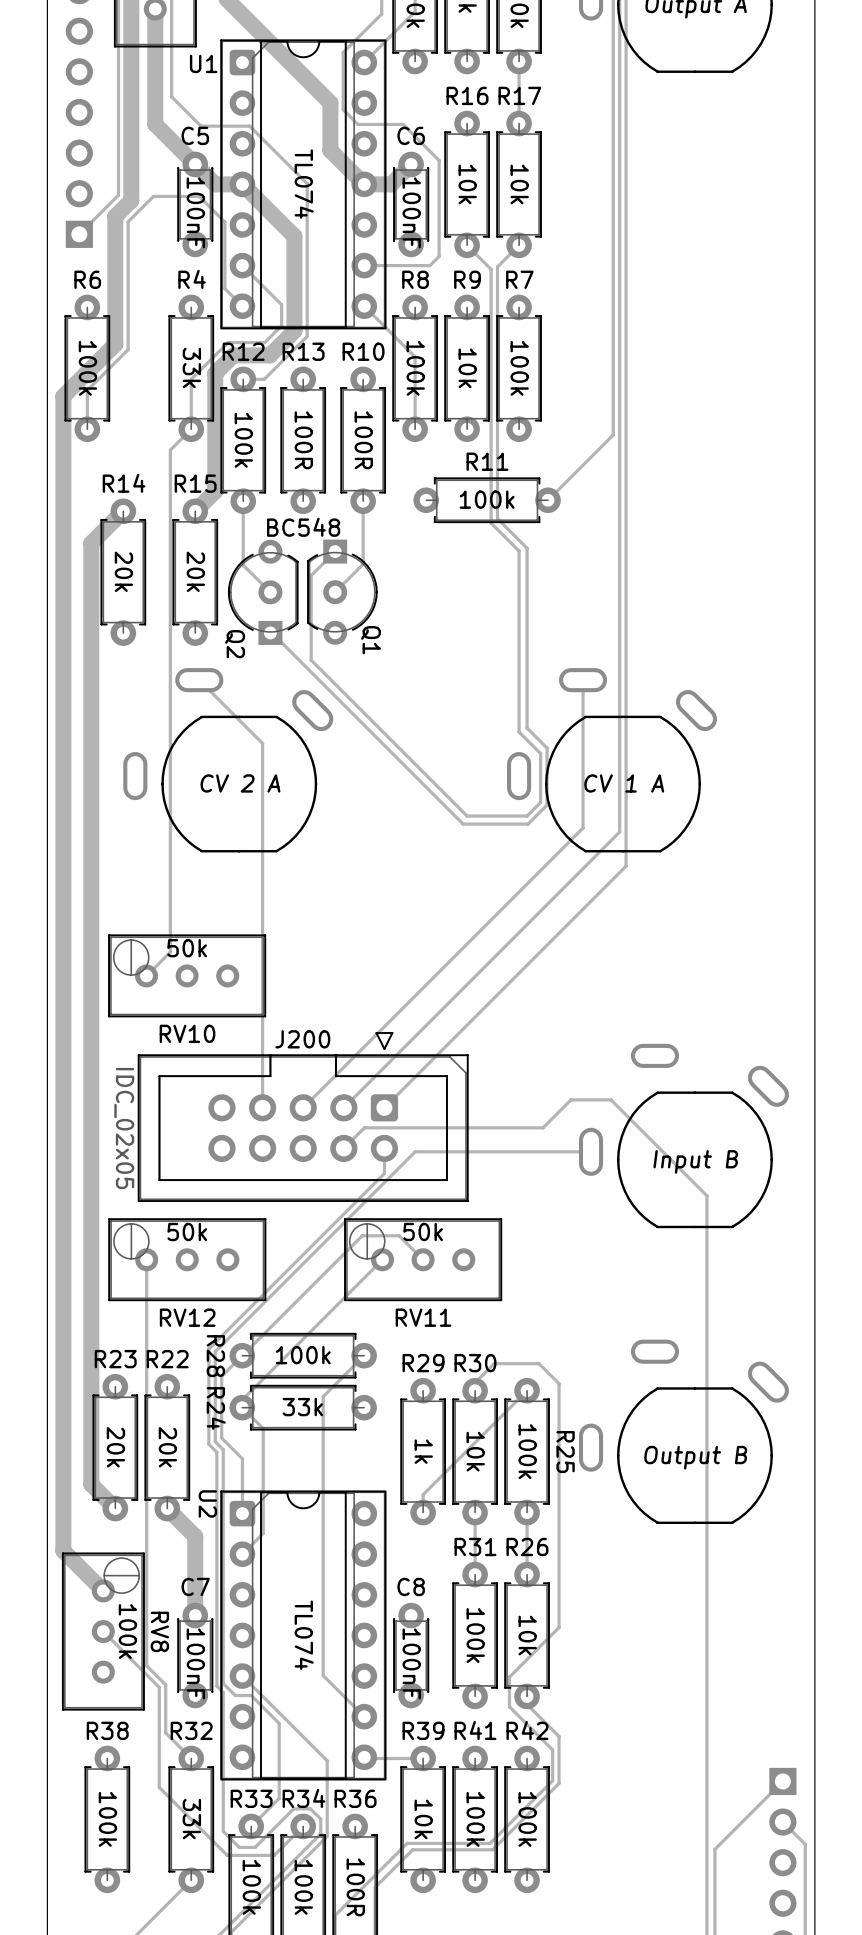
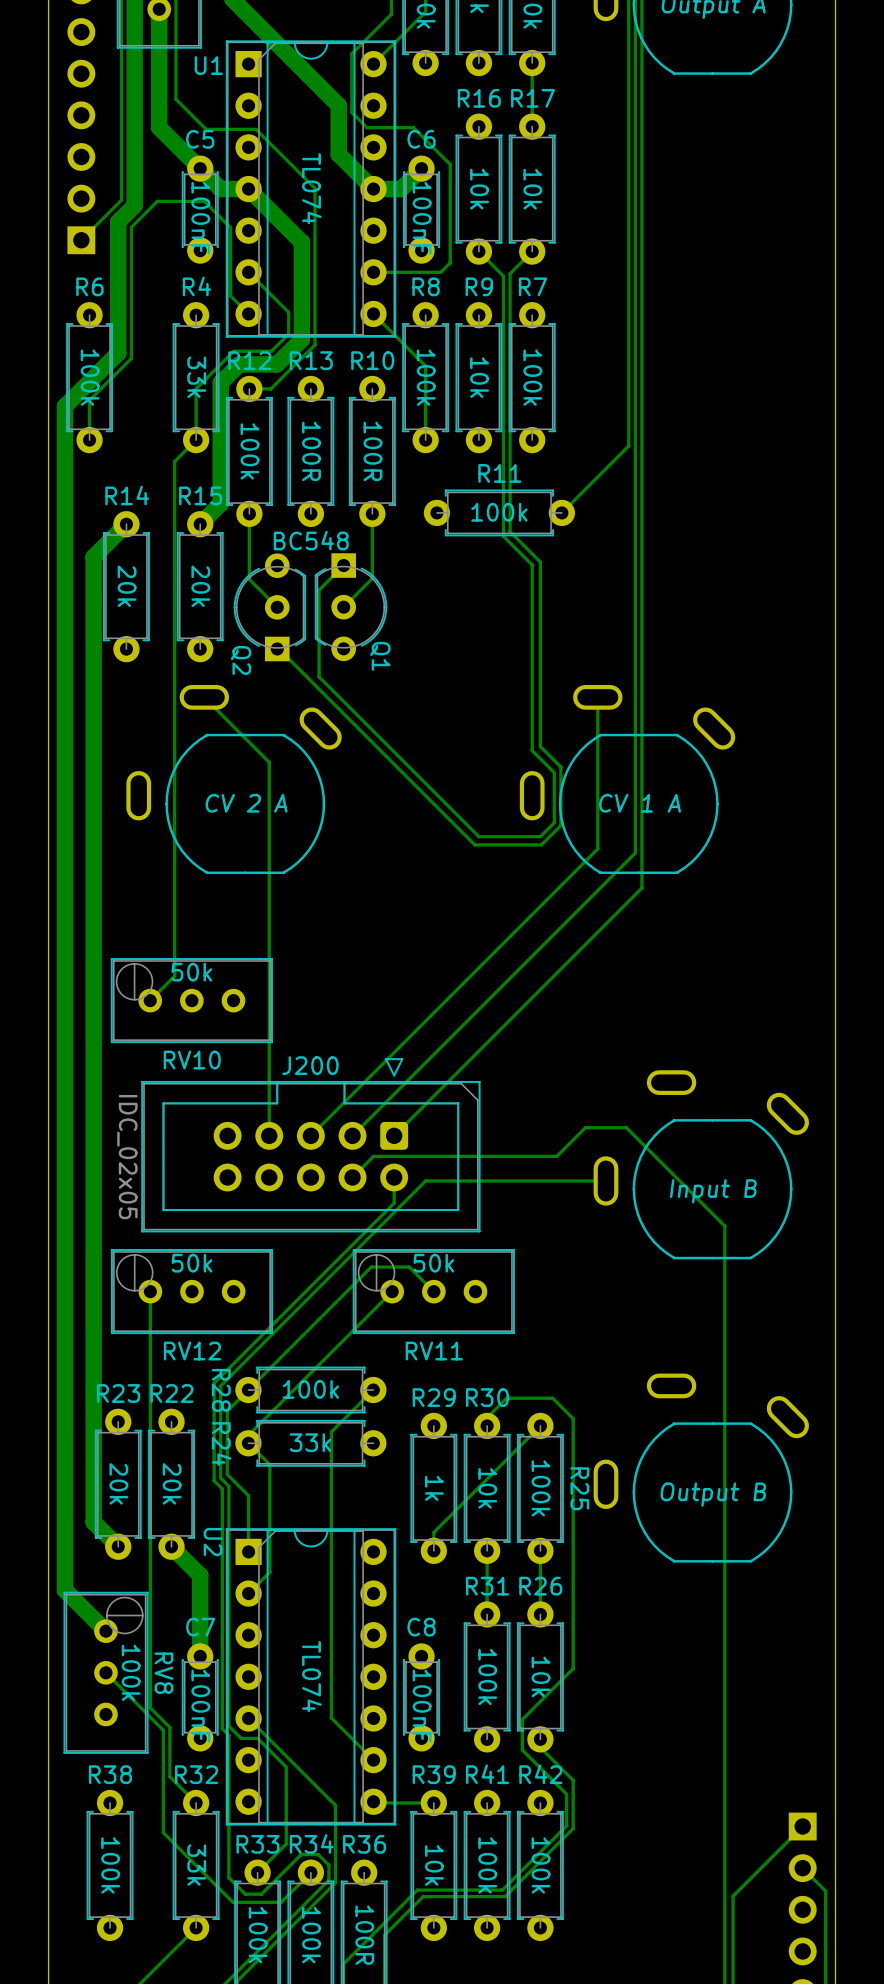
U1 footprint: [220, 39, 387, 330] -> [225, 40, 397, 338]
U2 footprint: [220, 1490, 387, 1781] -> [225, 1528, 397, 1826]

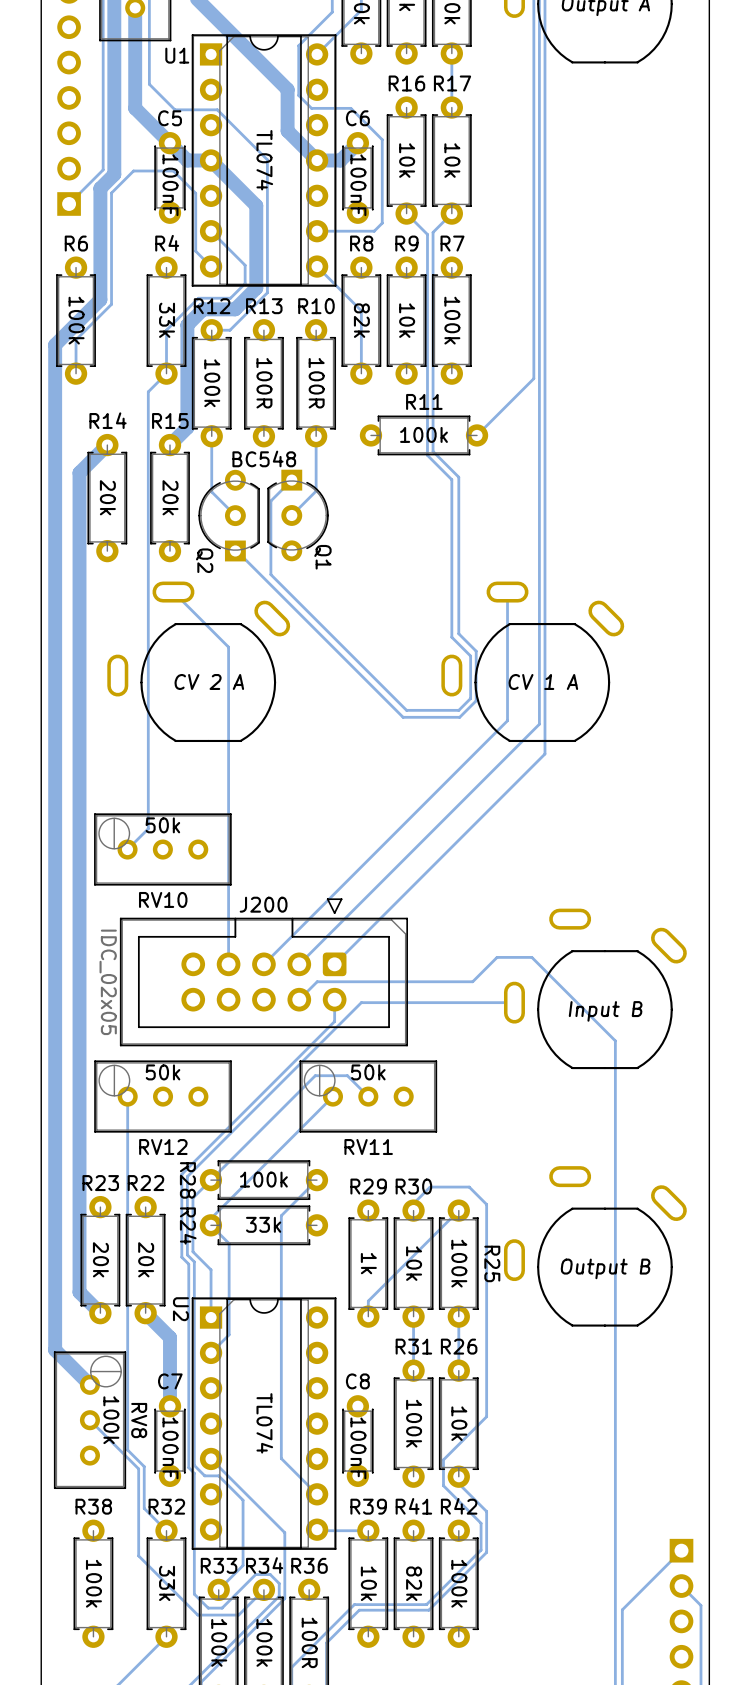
R8 value: 100k (426, 377) -> 82k (361, 320)
R41 value: 100k (487, 1865) -> 82k (414, 1583)

